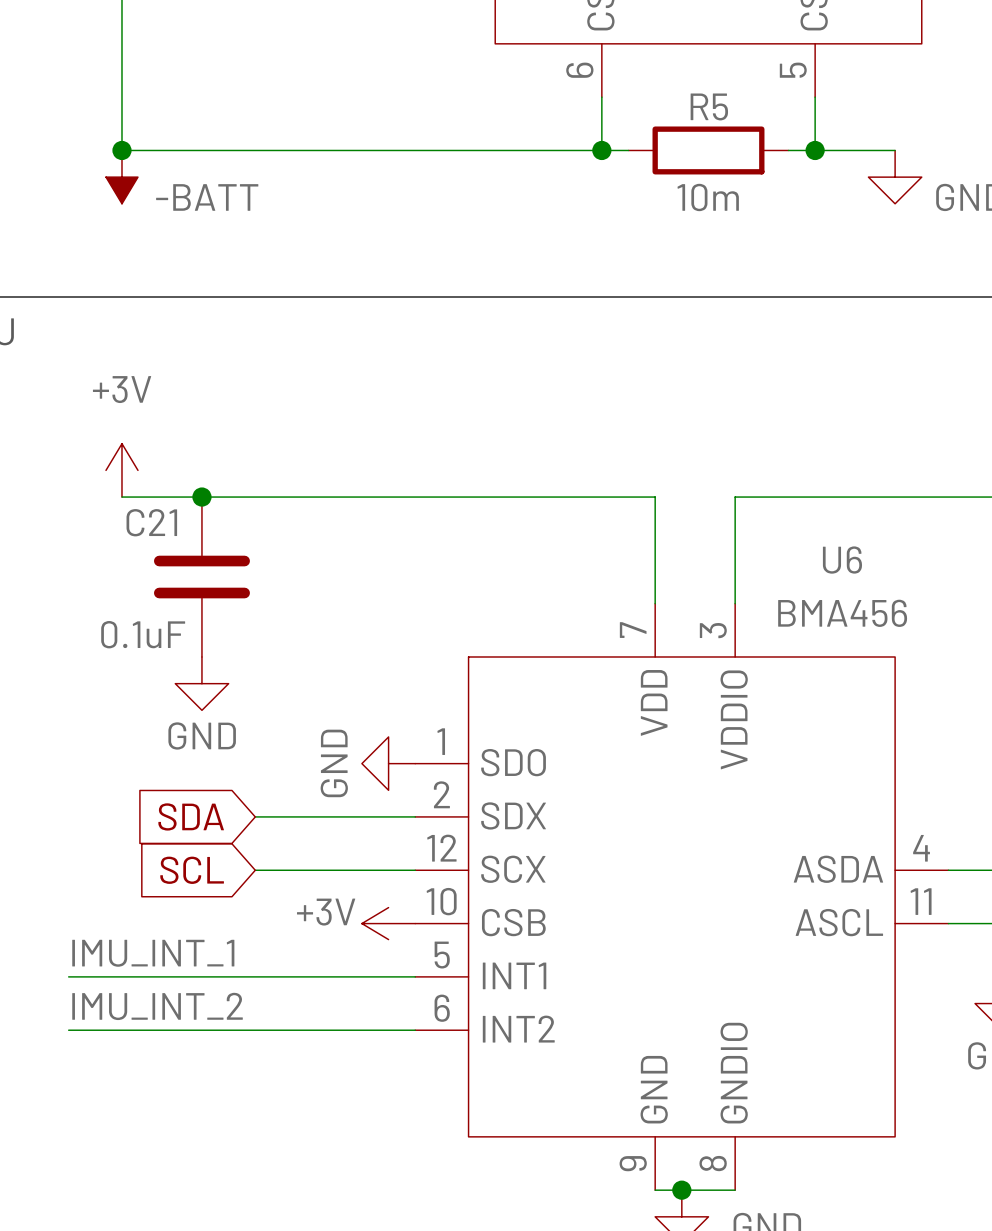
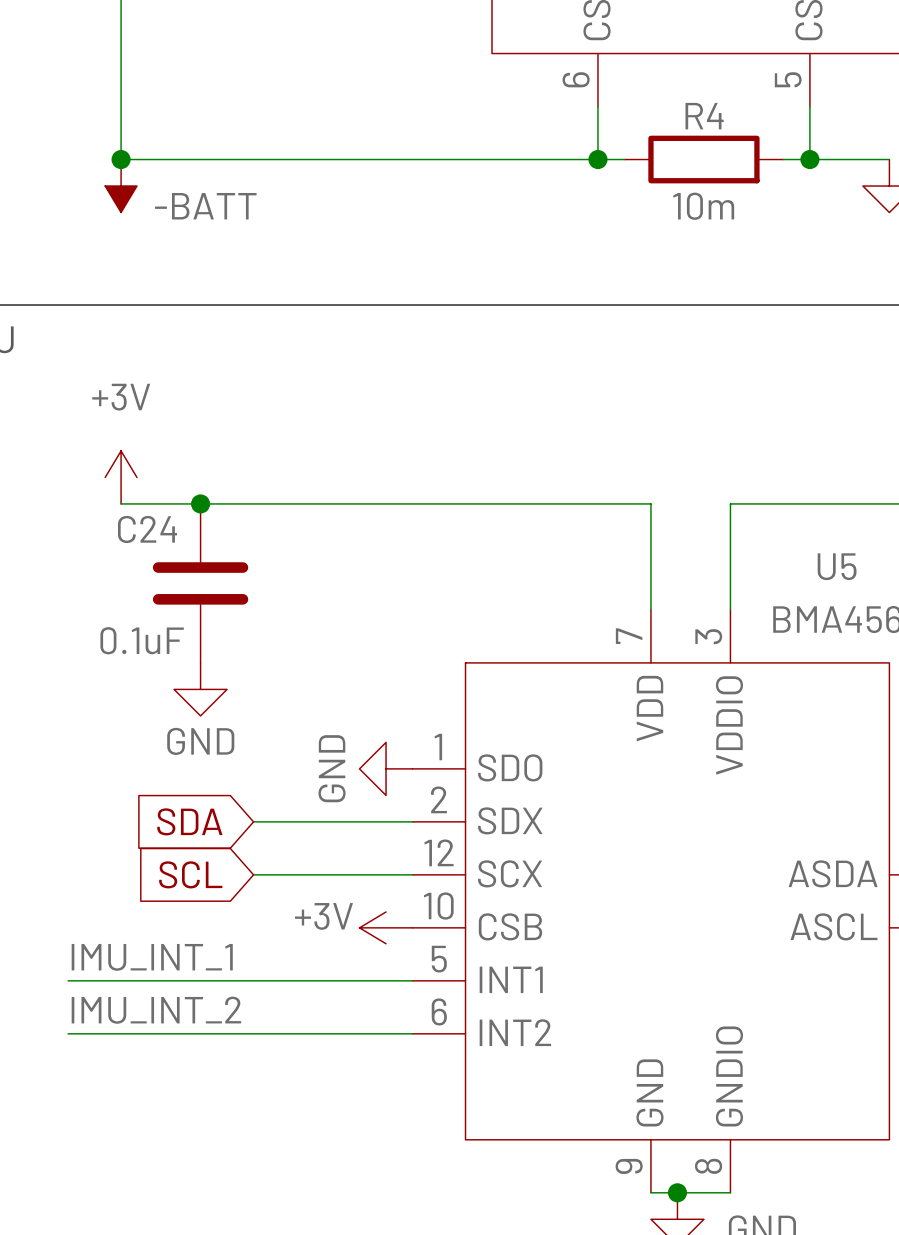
R5 name: R5 (709, 106) -> R4 (704, 116)
C21 name: C21 (151, 522) -> C24 (147, 529)
U6 name: U6 (842, 560) -> U5 (837, 566)

